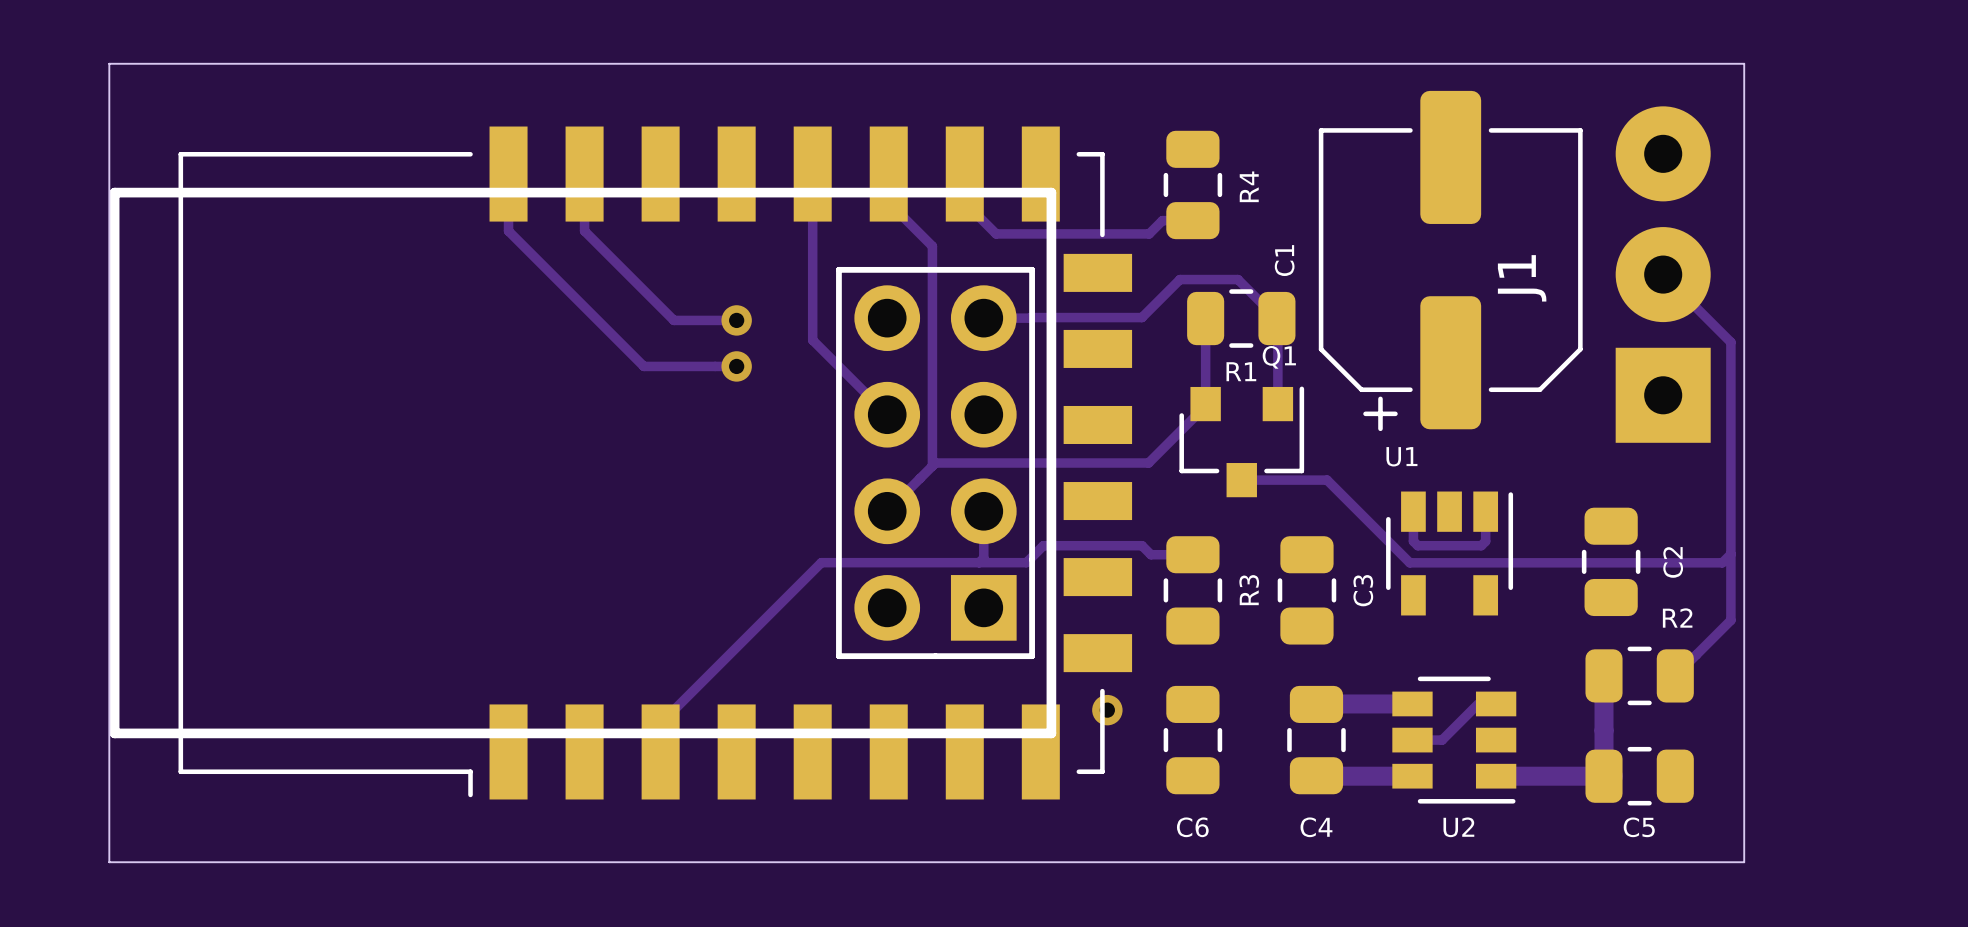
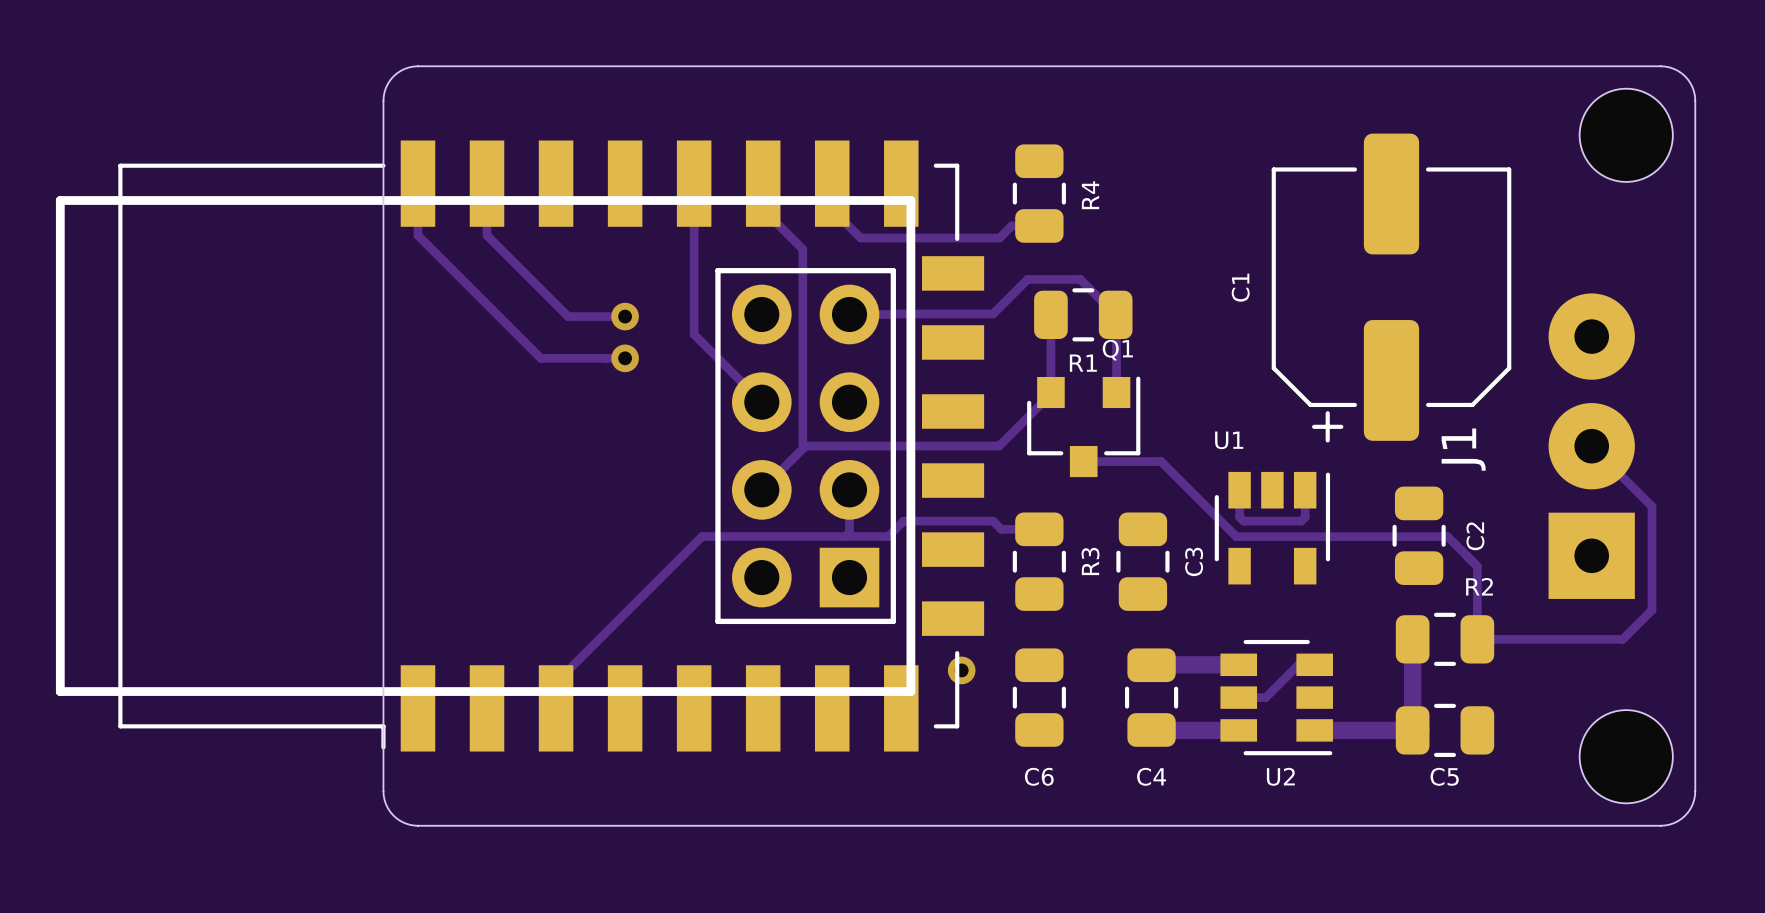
board edge: (109, 63) (109, 862) (1744, 862) (1744, 63) (109, 63) -> (417, 66) (404, 68) (393, 76) (386, 87) (383, 100) (383, 791) (388, 808) (400, 821) (417, 825) (1660, 825) (1678, 821) (1690, 808) (1695, 791) (1695, 100) (1690, 83) (1678, 70) (1660, 66) (417, 66)
C1 footprint: [1318, 90, 1583, 432] -> [1271, 133, 1512, 443]
part: none -> (1626, 135)
track: (1663, 274) (1730, 342) (1730, 620) (1675, 675) -> none
J1 position: (1663, 274) -> (1591, 446)
track: (1730, 554) (1722, 562) (1642, 562) -> (1591, 446) (1651, 506) (1651, 610) (1622, 639) (1477, 639) (1477, 566) (1447, 536)
part: none -> (1626, 756)

